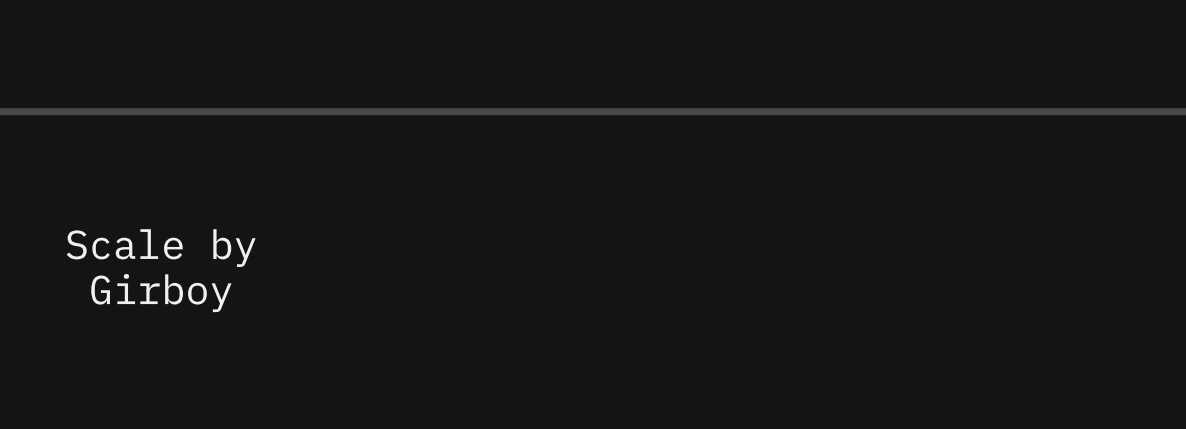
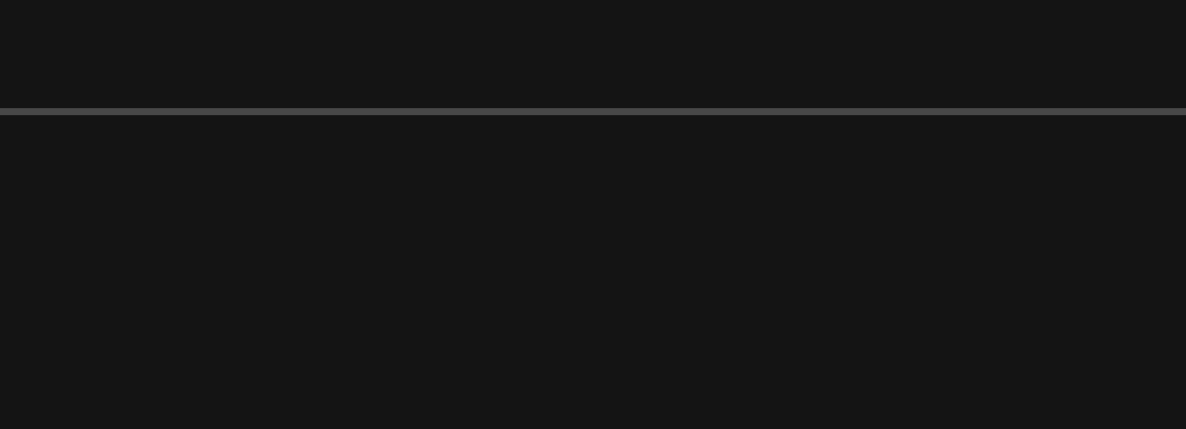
text: Scale by (161, 248) -> none
text: Girboy (161, 293) -> none

